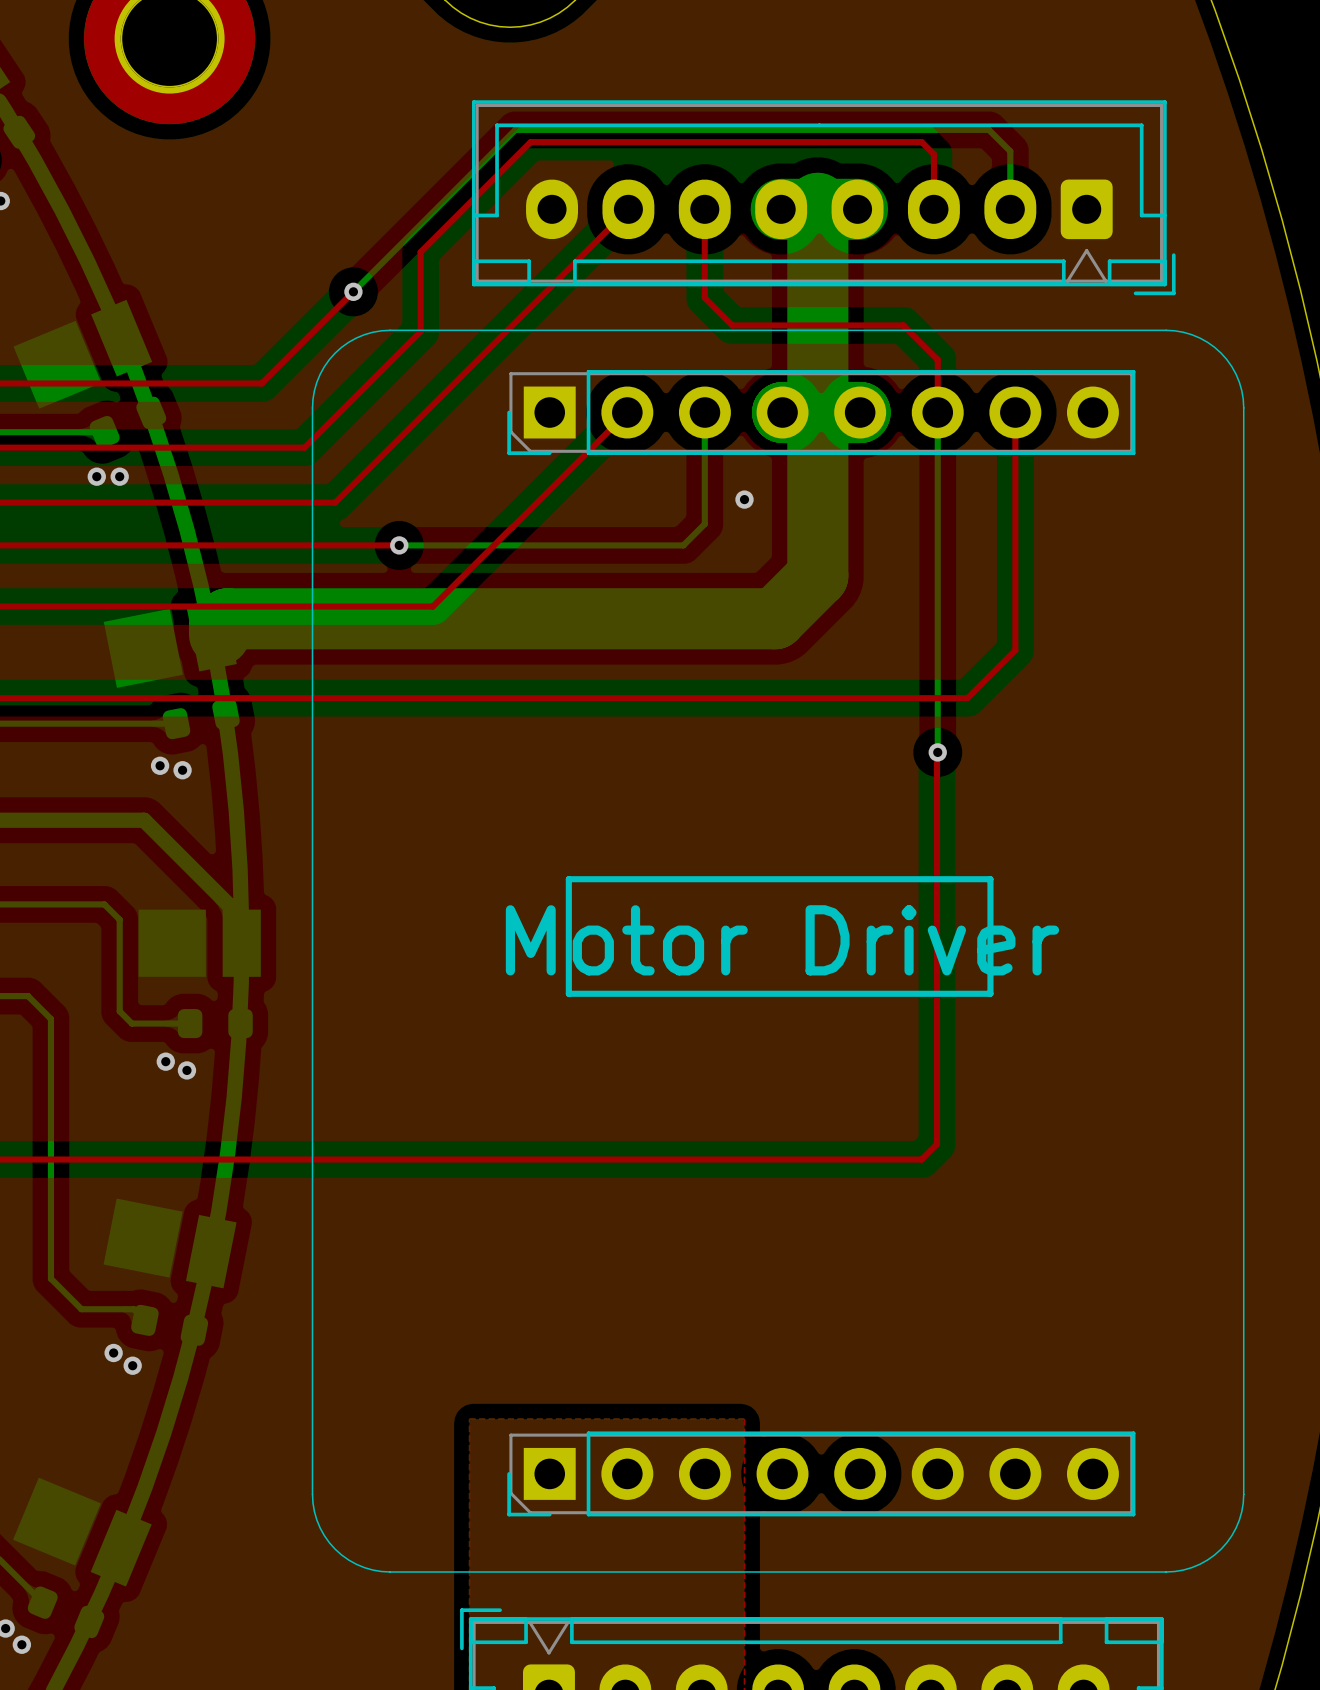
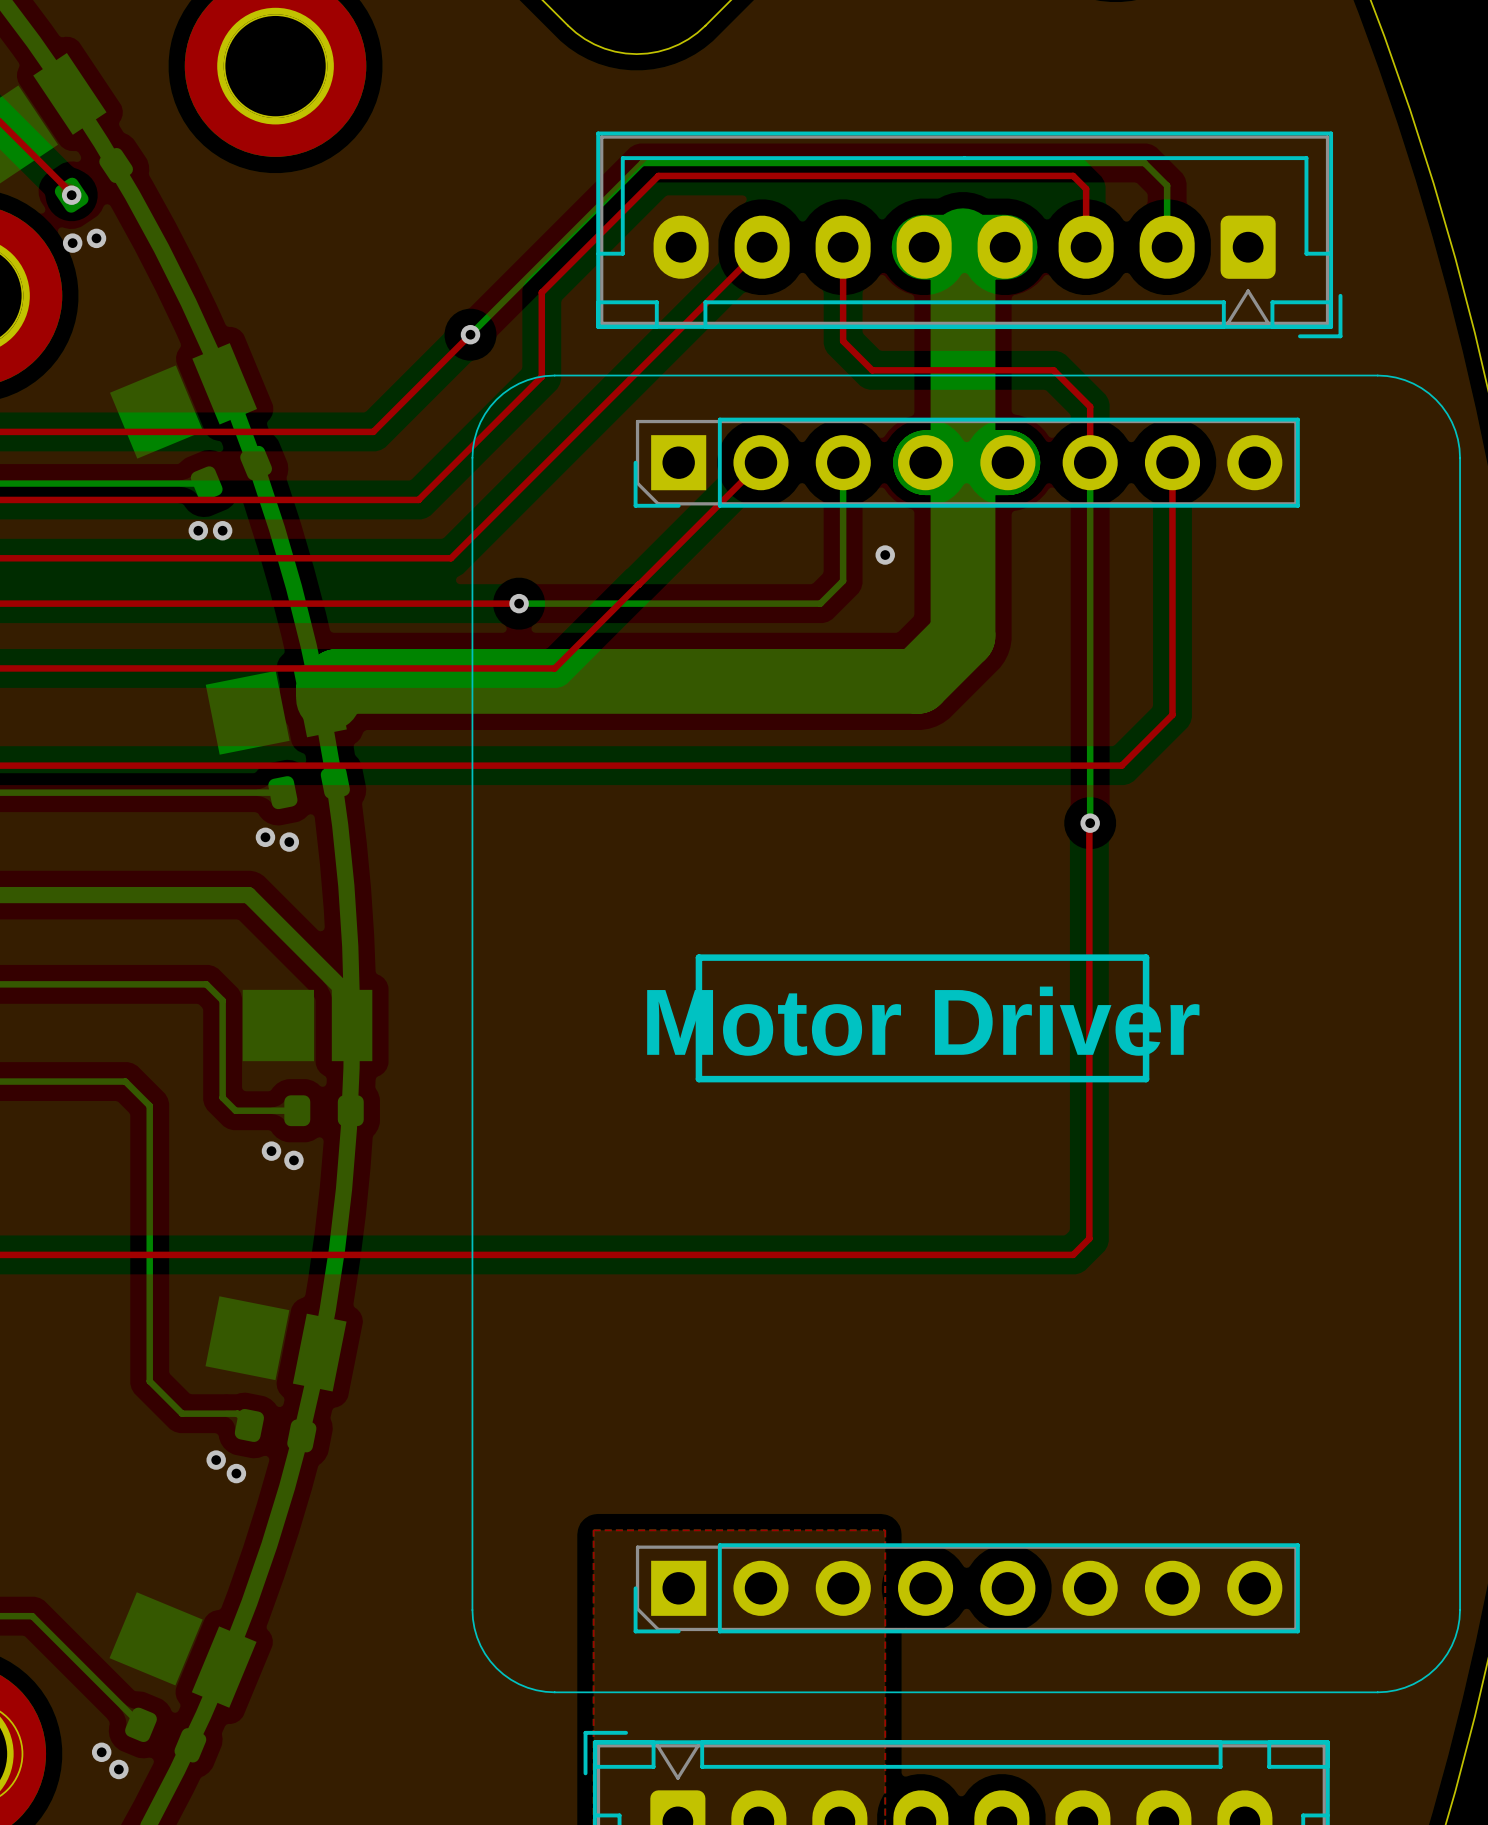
drawing position: (778, 951) -> (966, 1033)

